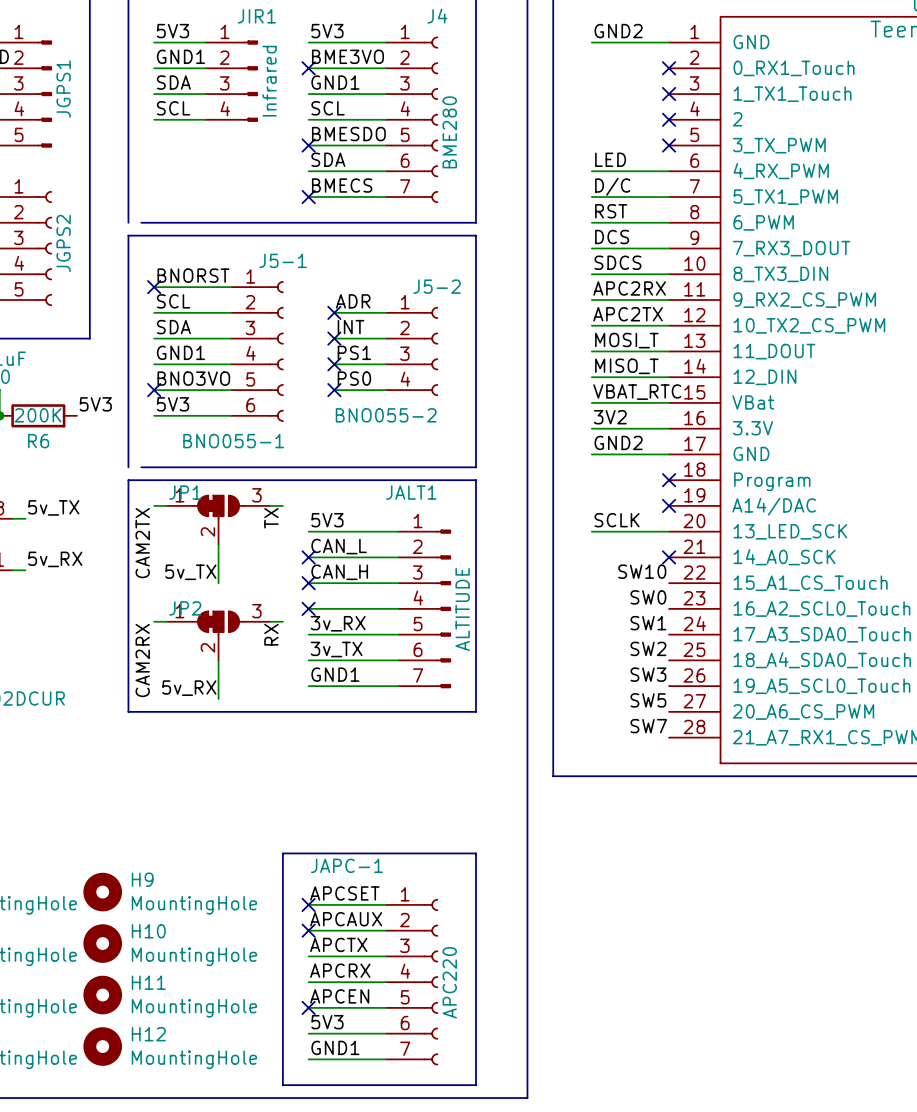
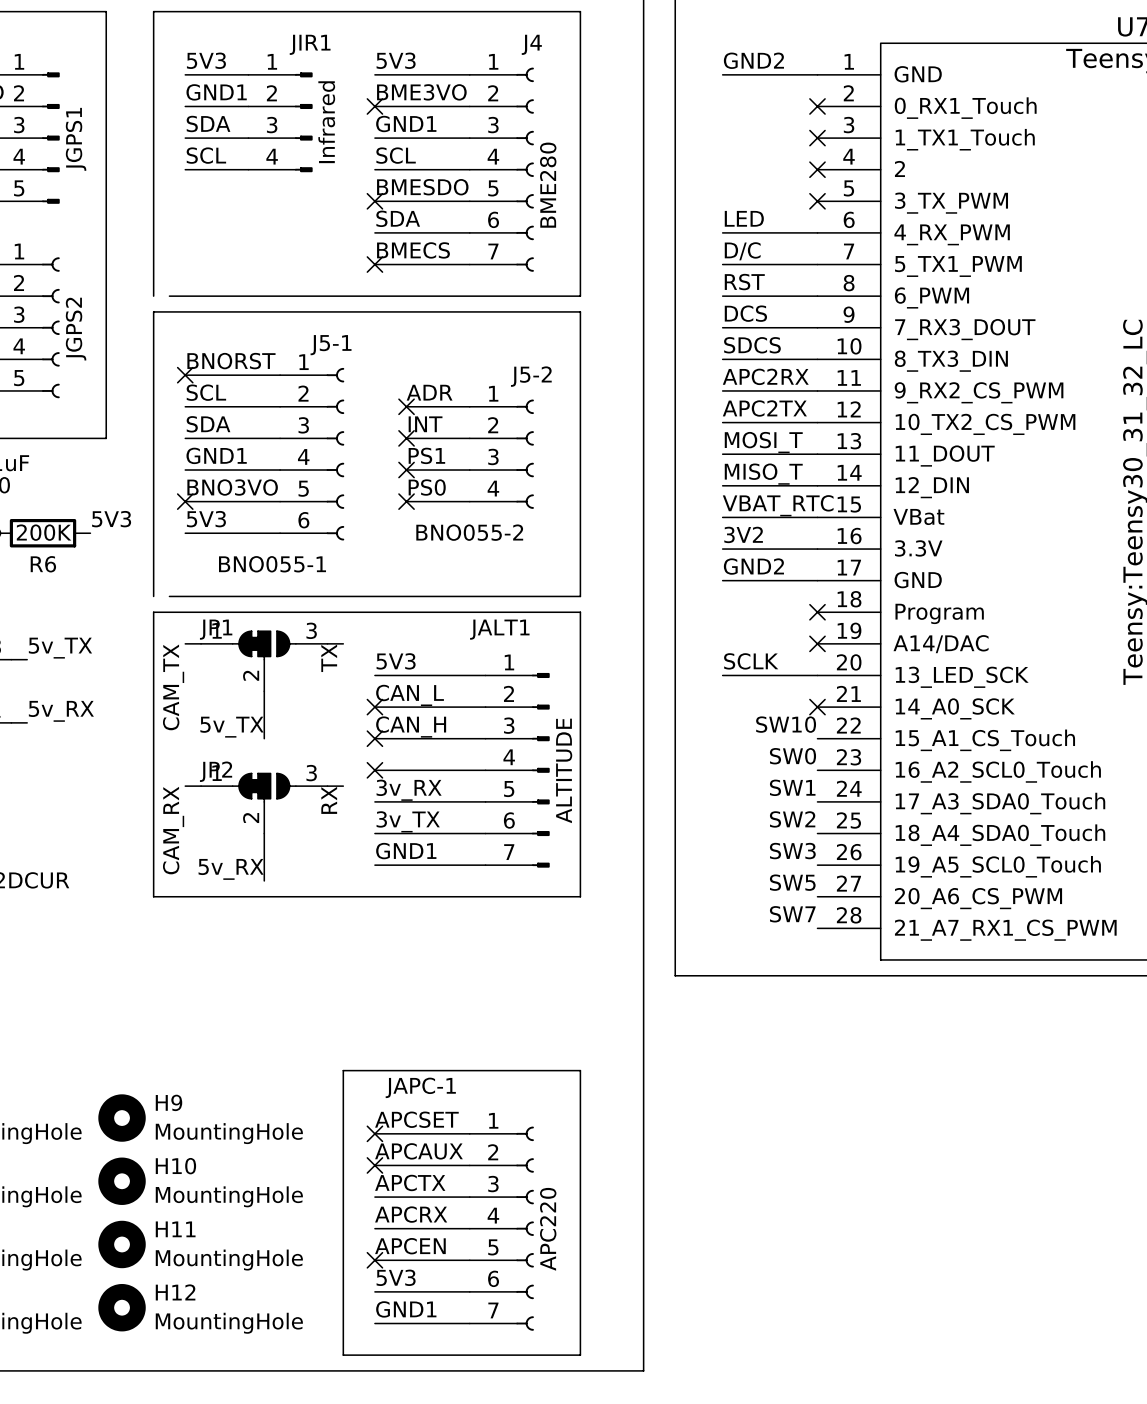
label: CAM2TX (142, 543) -> CAM_TX (173, 687)
label: CAM2RX (142, 660) -> CAM_RX (173, 830)

